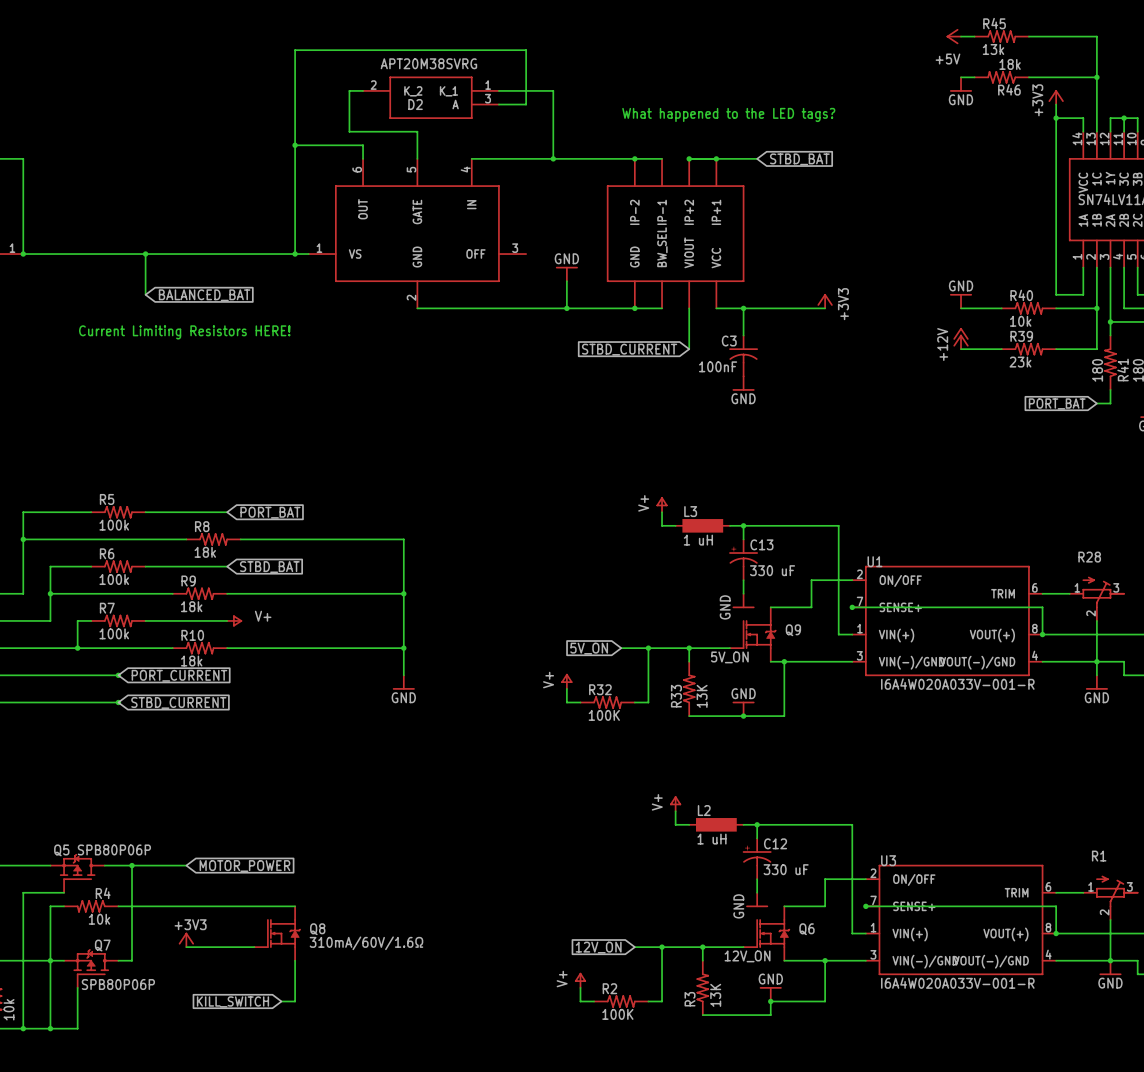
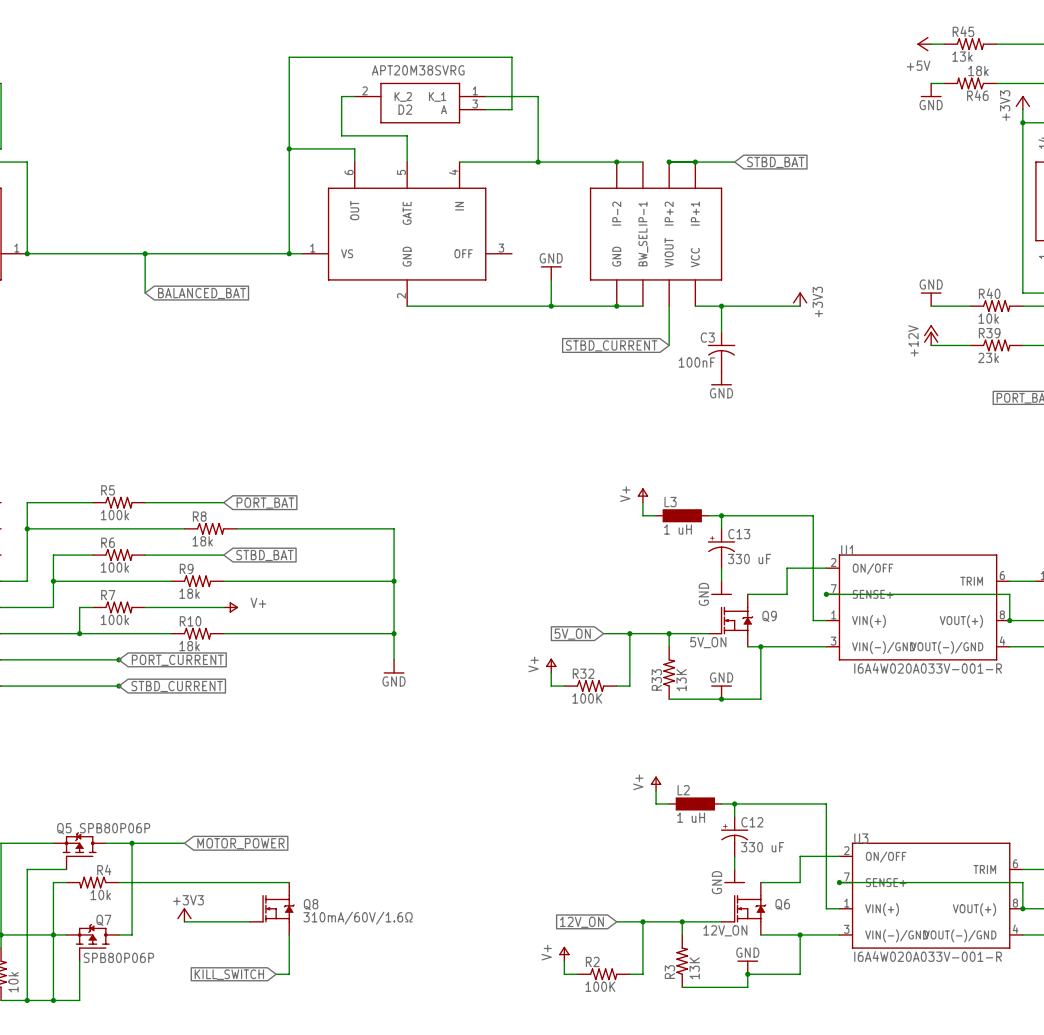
text: What happened to the LED tags? (728, 114) -> none
text: Current Limiting Resistors HERE! (184, 332) -> none

